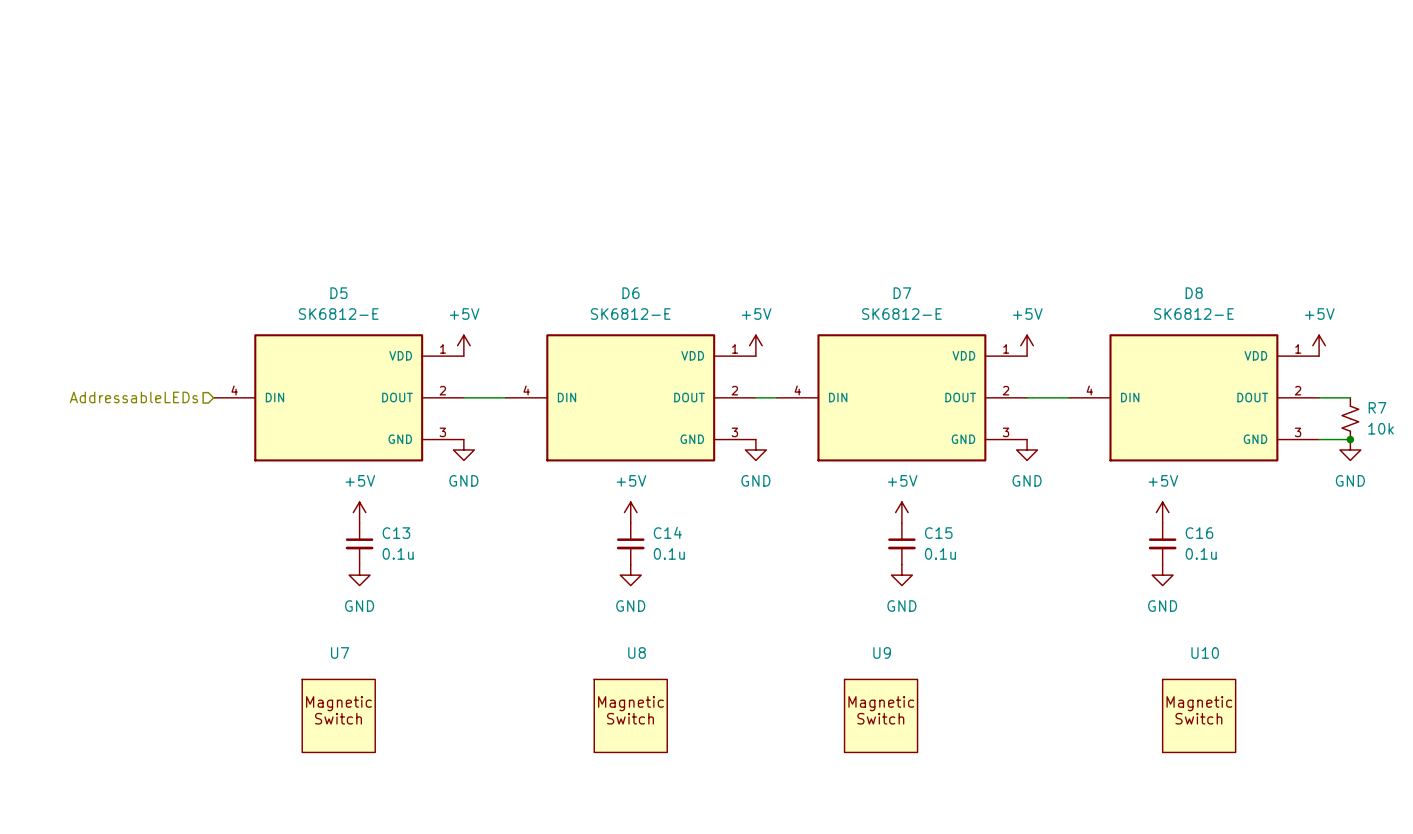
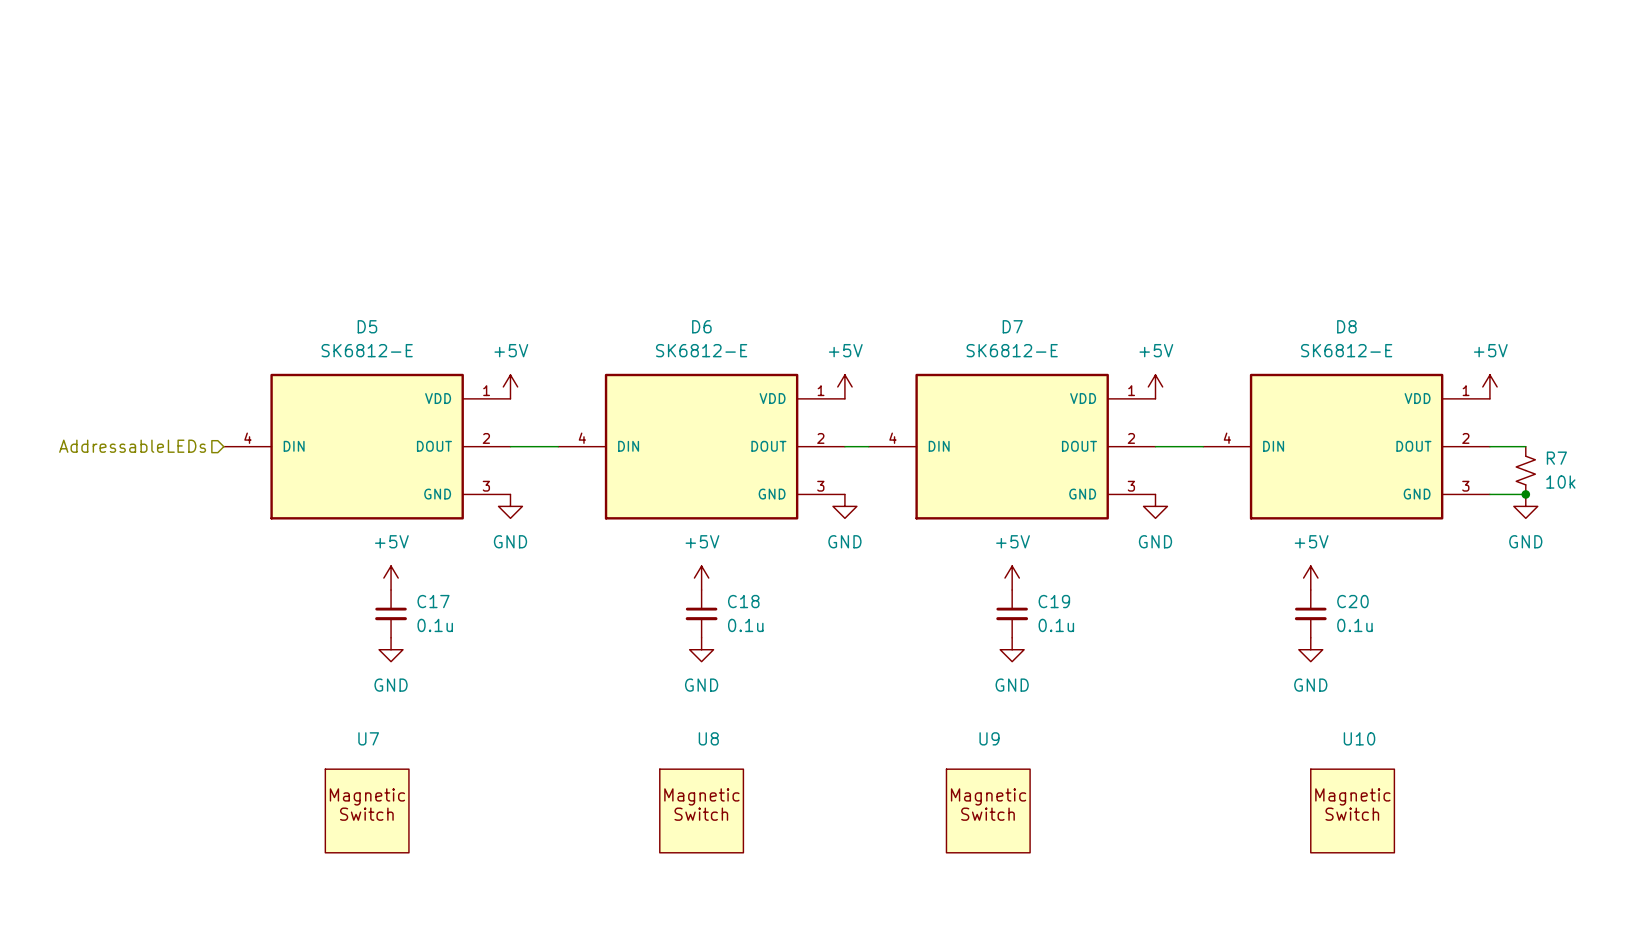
C14 name: C14 (667, 532) -> C18 (743, 601)
C13 name: C13 (396, 533) -> C17 (433, 601)
C15 name: C15 (938, 533) -> C19 (1054, 601)
C16 name: C16 (1199, 533) -> C20 (1352, 601)

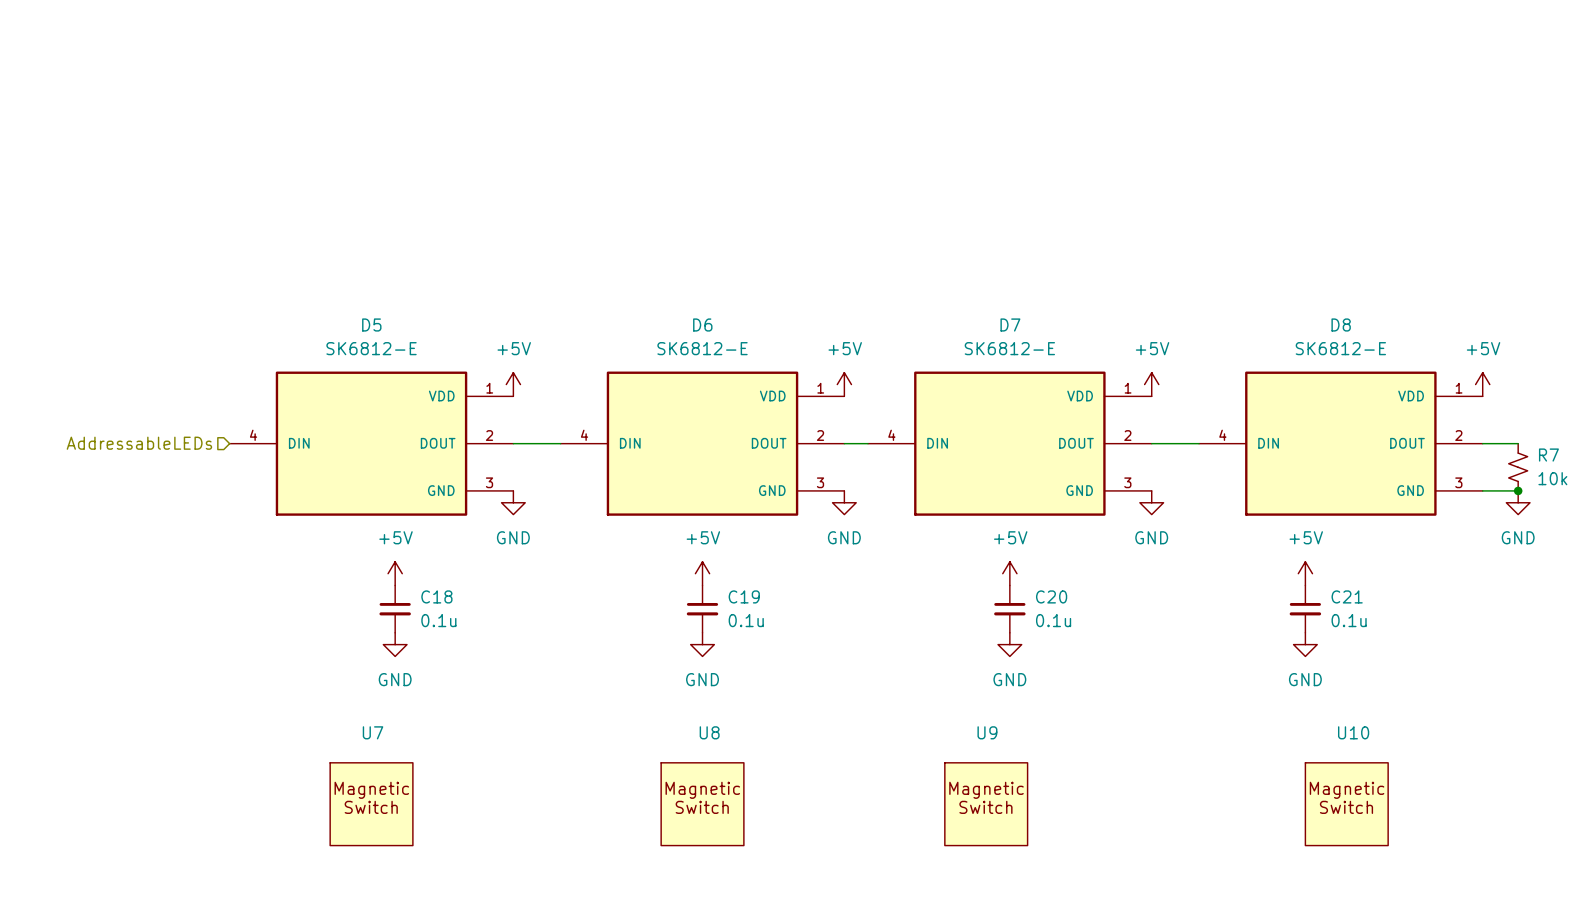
C17 name: C17 (433, 601) -> C18 (436, 596)
C18 name: C18 (743, 601) -> C19 (744, 596)
C19 name: C19 (1054, 601) -> C20 (1051, 596)
C20 name: C20 (1352, 601) -> C21 (1347, 596)

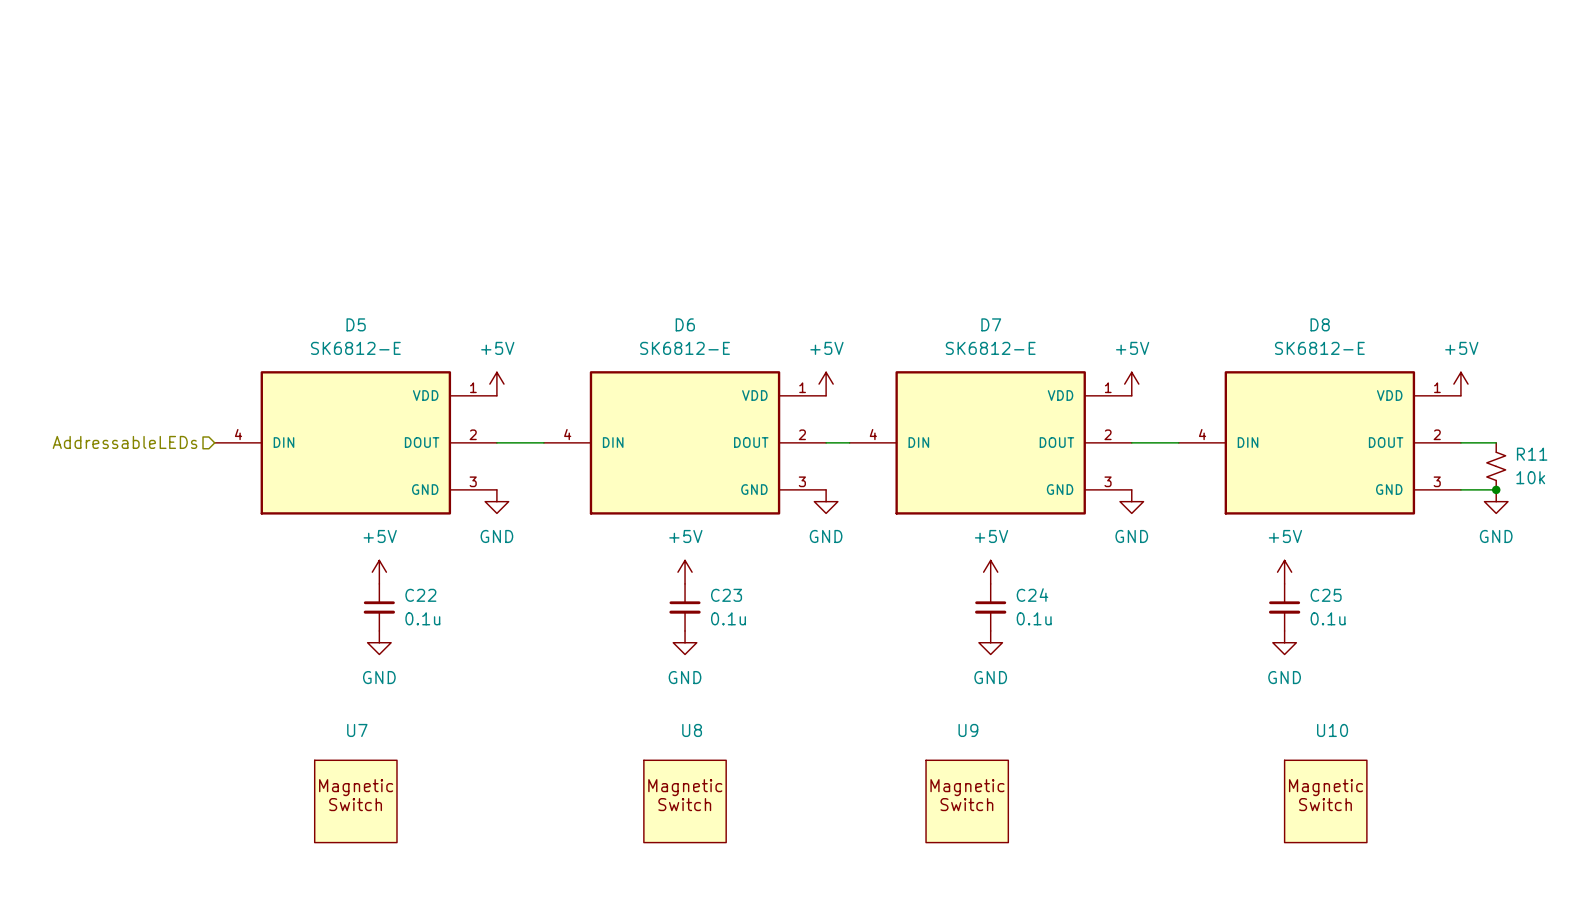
R7 name: R7 (1548, 455) -> R11 (1532, 454)
C18 name: C18 (436, 596) -> C22 (420, 595)
C19 name: C19 (744, 596) -> C23 (726, 595)
C20 name: C20 (1051, 596) -> C24 (1032, 595)
C21 name: C21 (1347, 596) -> C25 (1326, 595)

